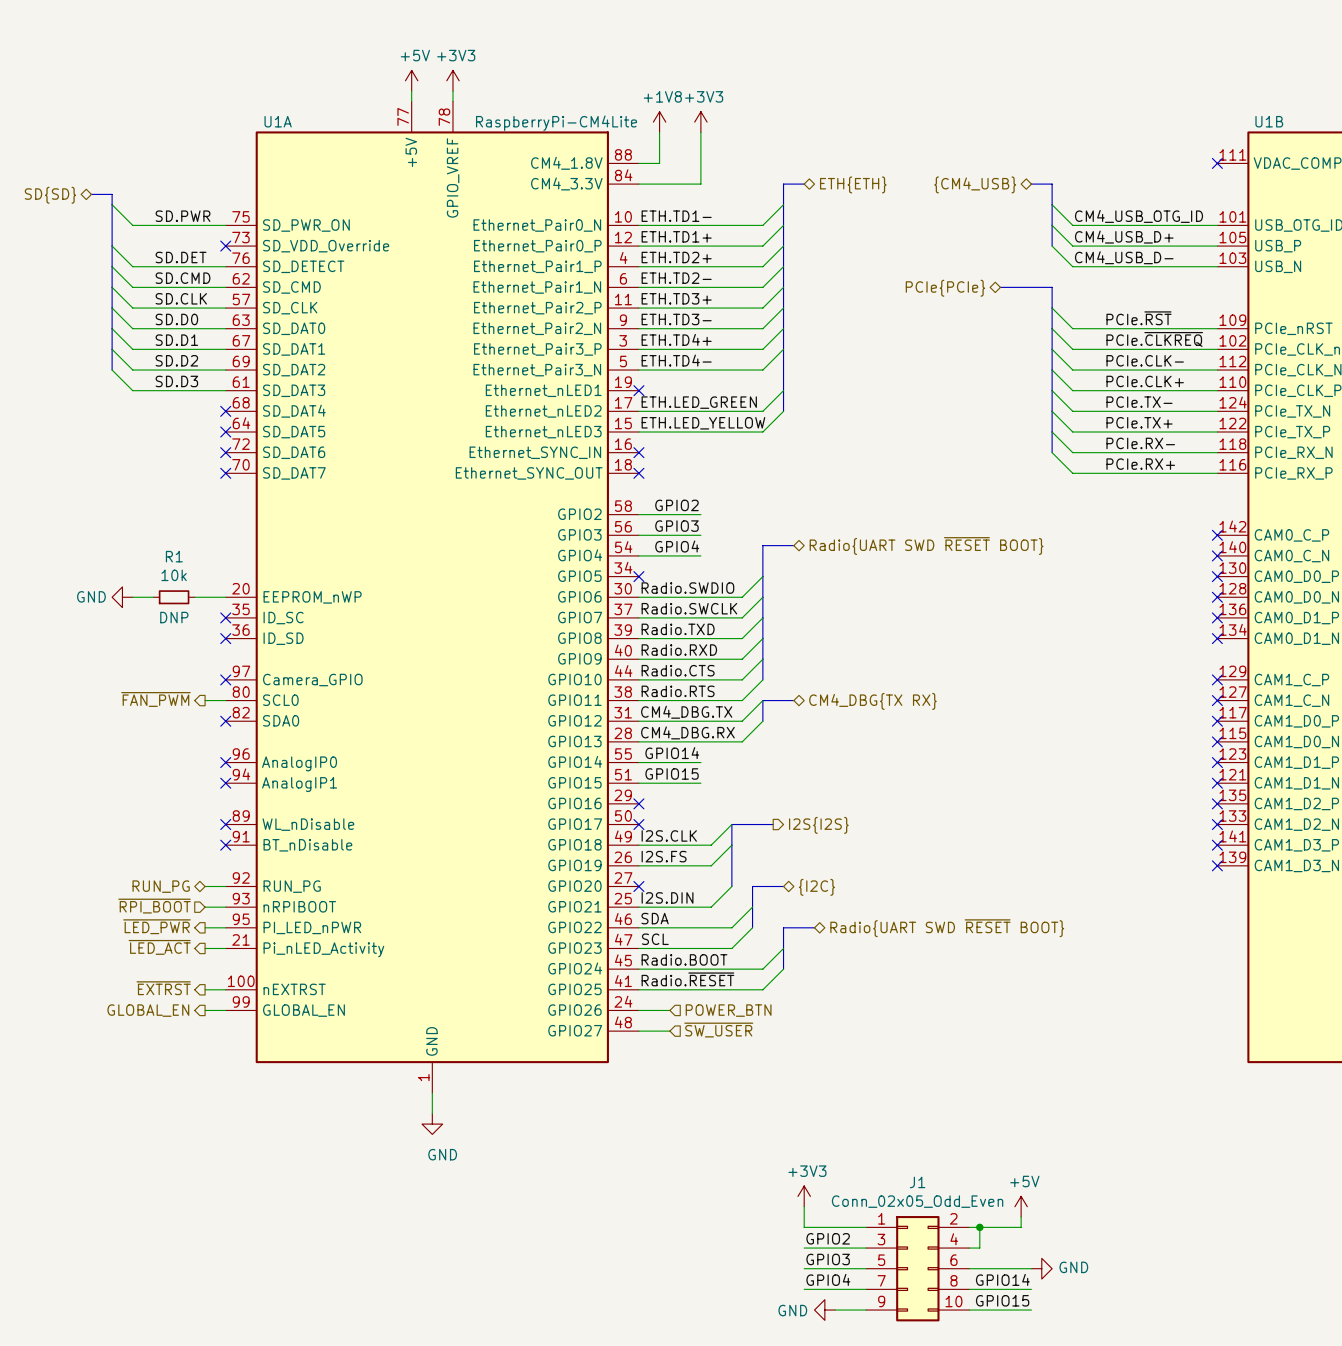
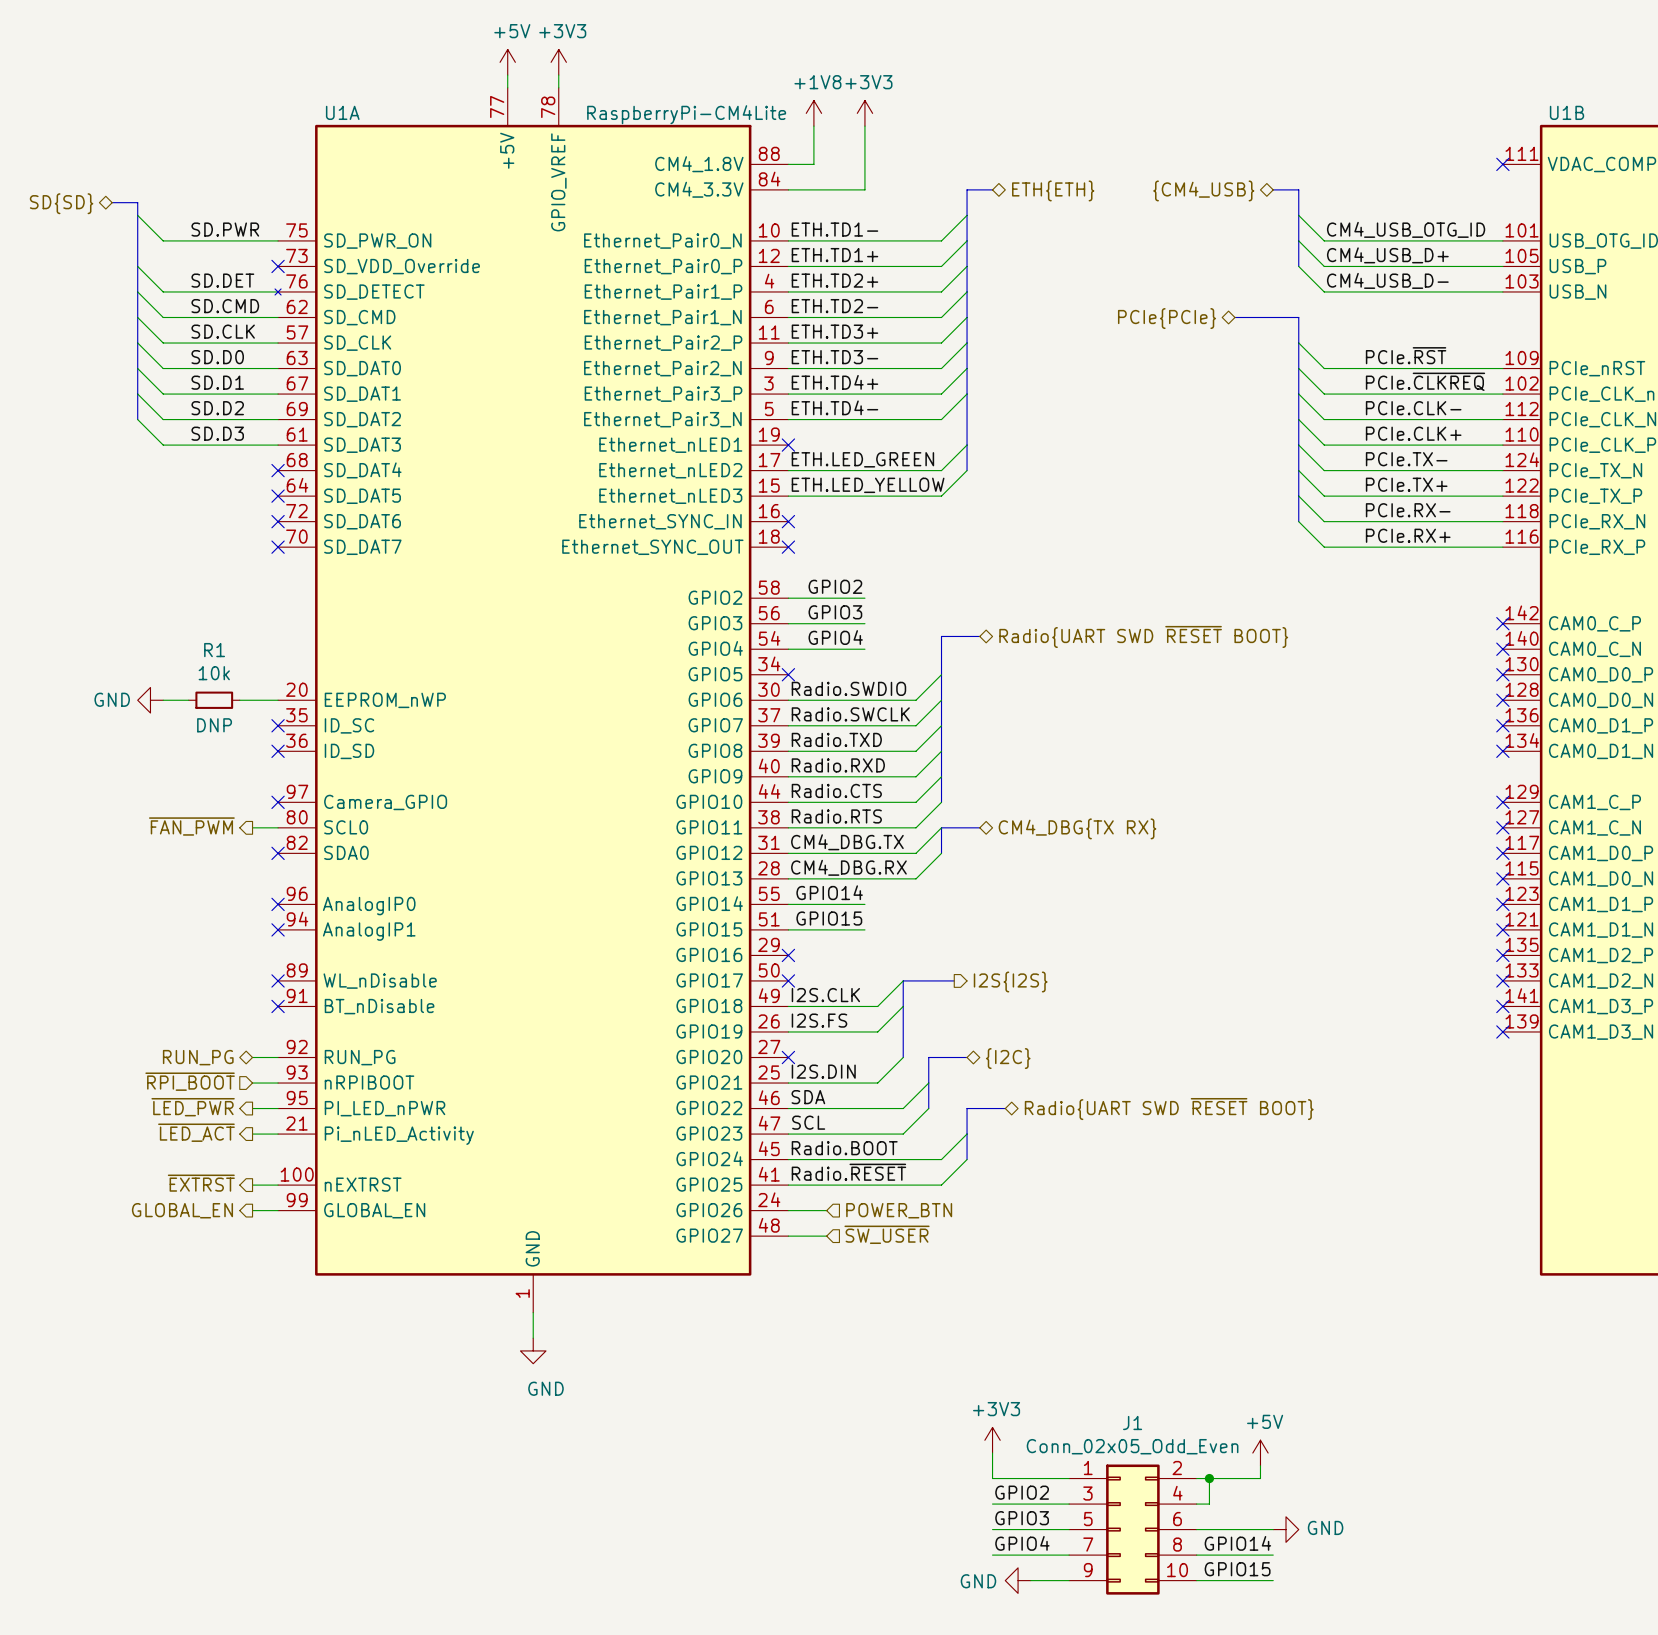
U1A symbol: [225, 101, 639, 1094] -> [275, 87, 789, 1313]

